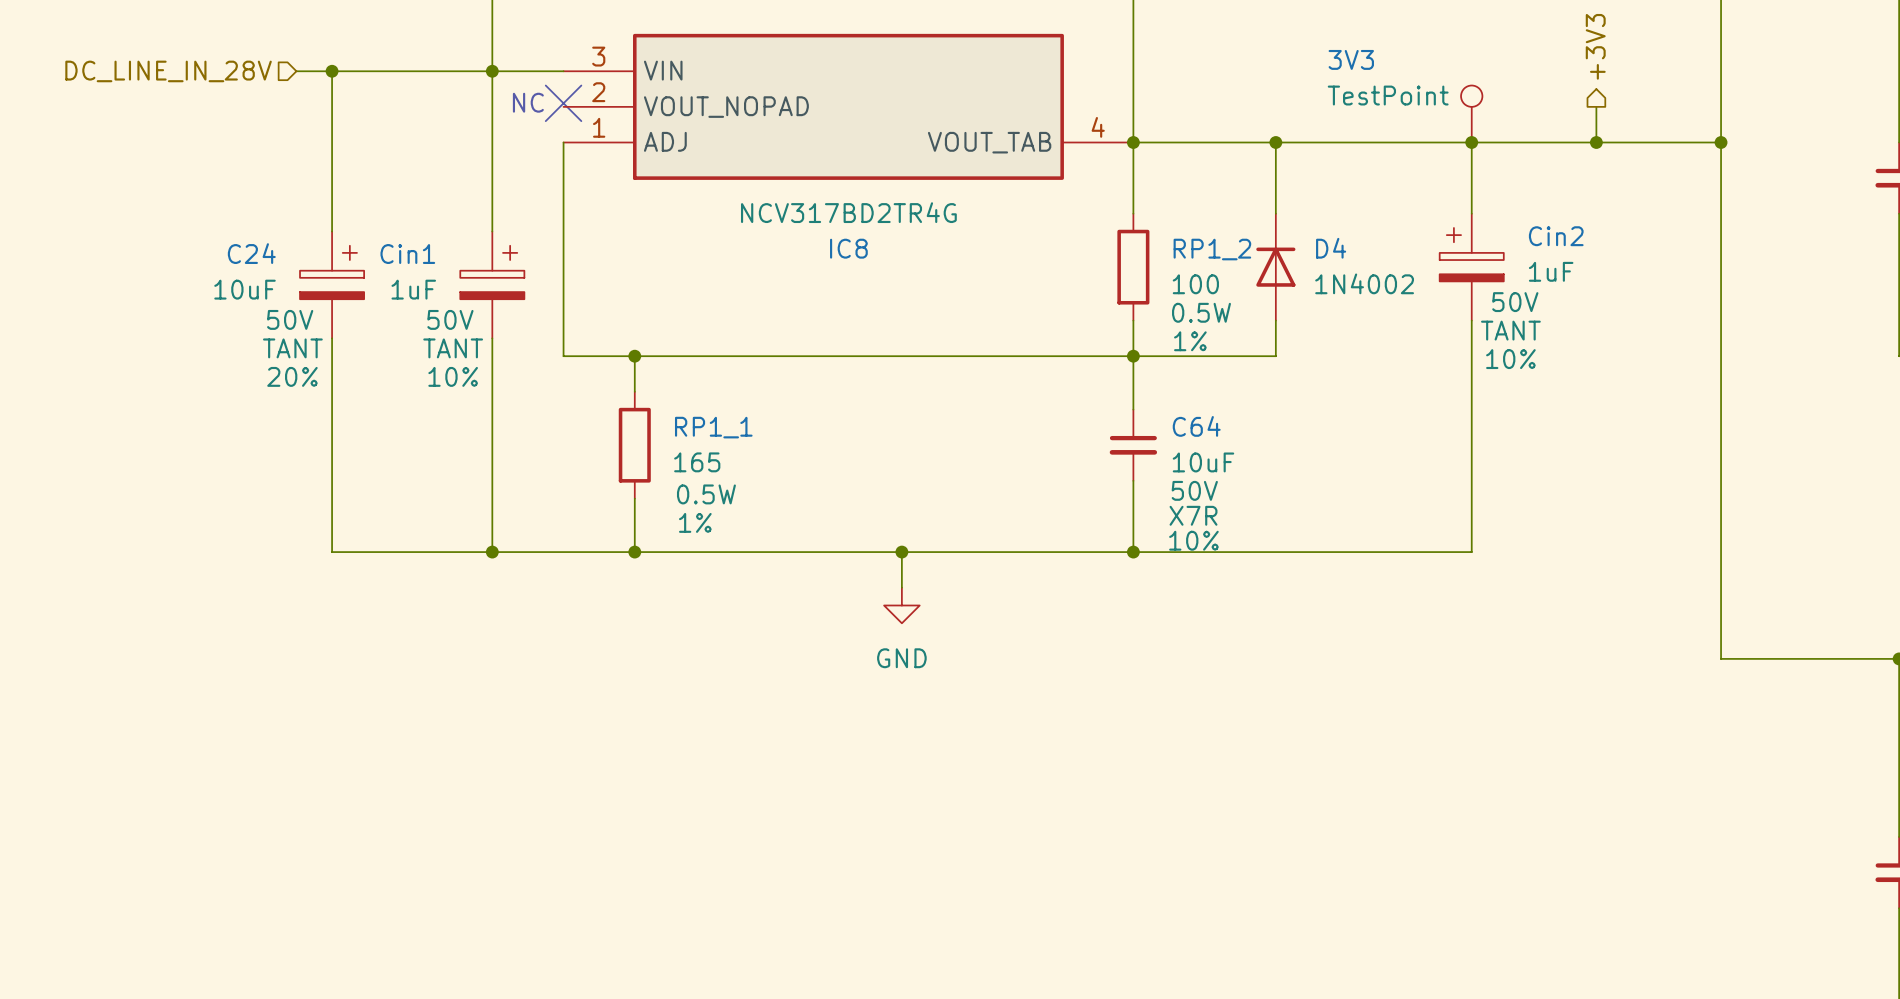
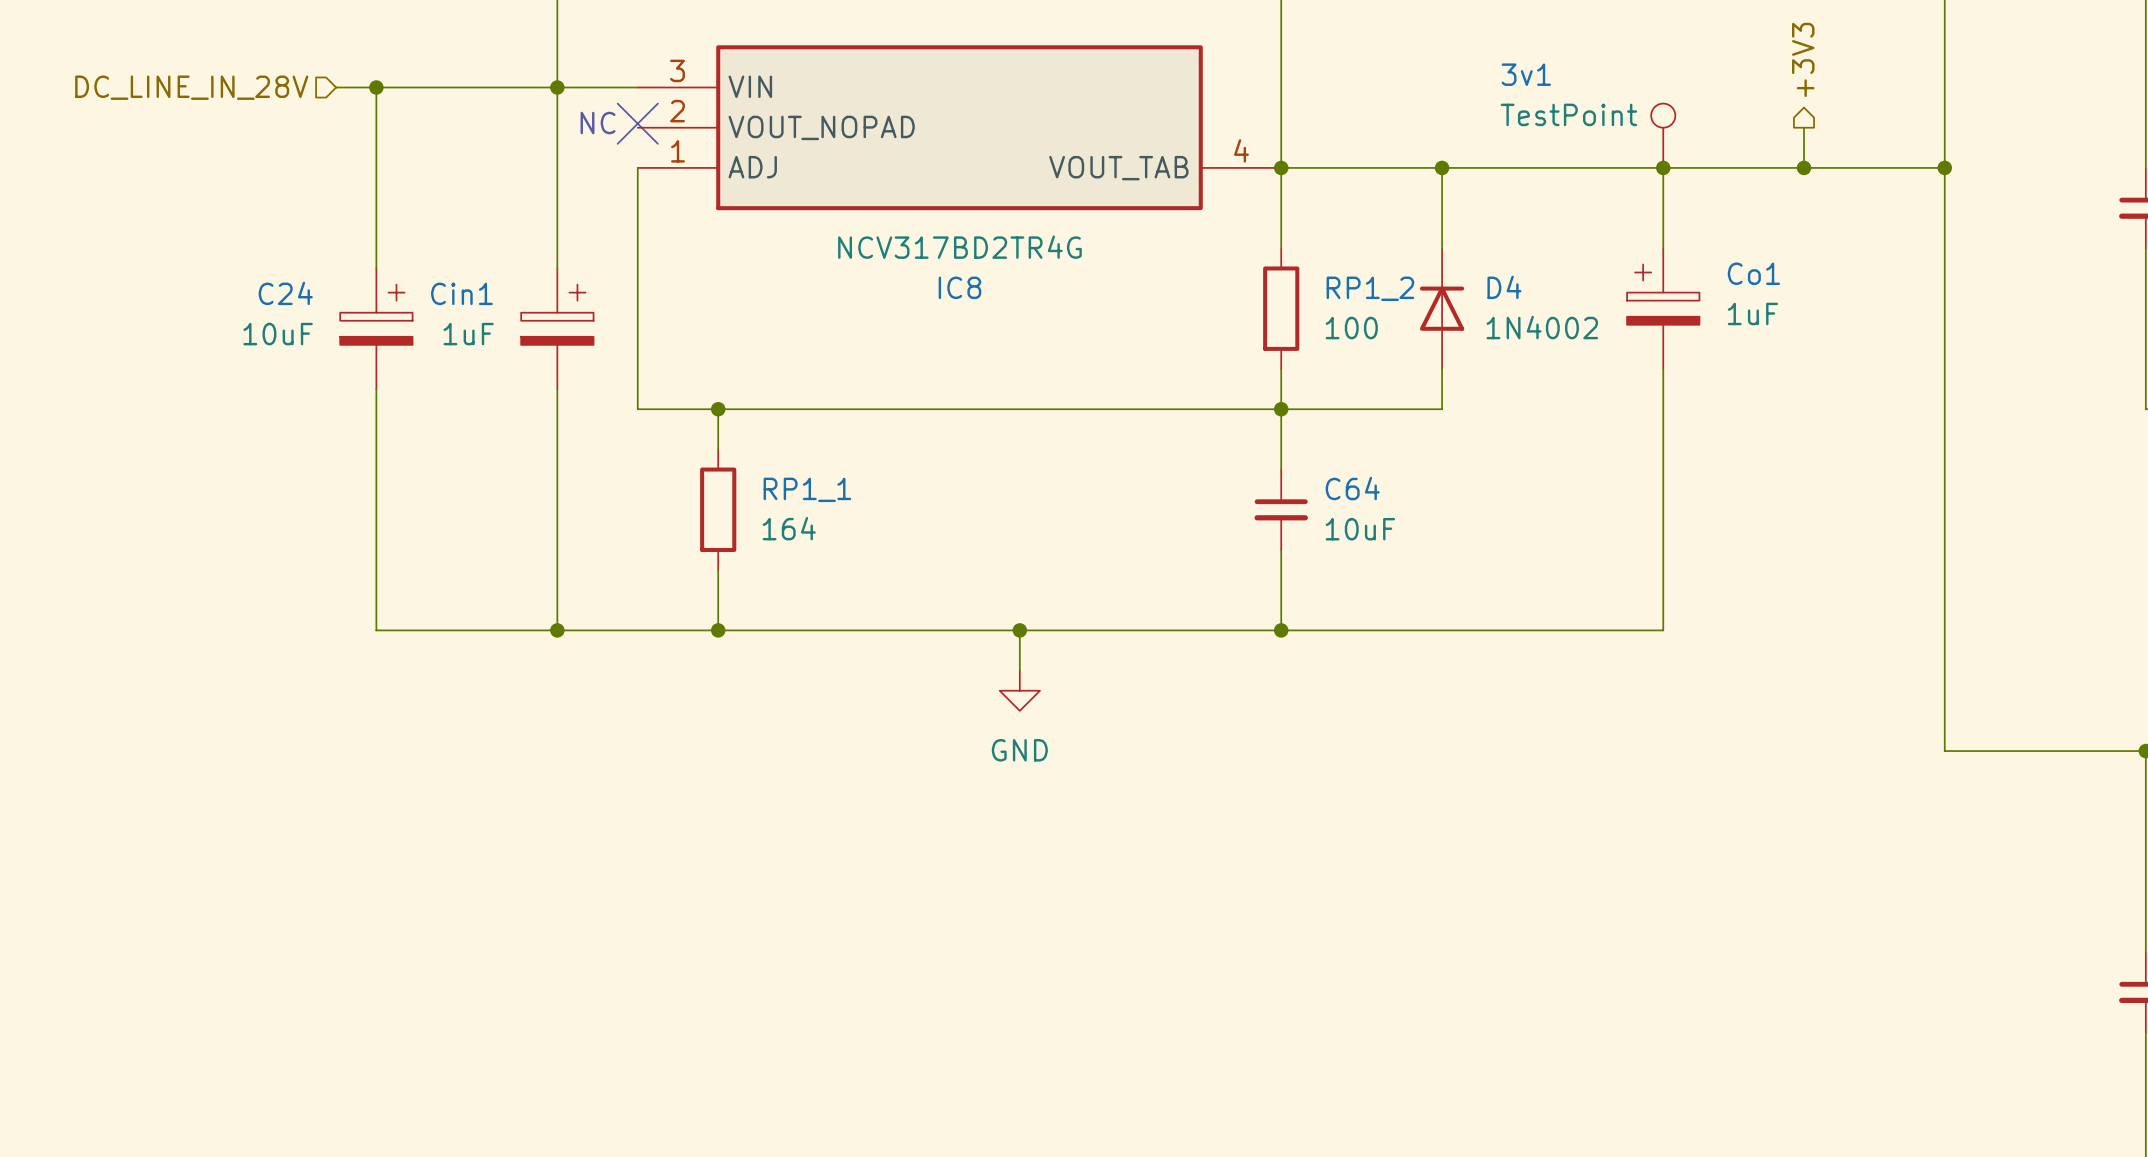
3V3 name: 3V3 (1351, 59) -> 3v1 (1526, 74)
Cin2 name: Cin2 (1556, 236) -> Co1 (1753, 273)
Cin2 text: 50V (1515, 302) -> none
RP1_2 text: 0.5W (1201, 312) -> none
C24 text: 50V (290, 319) -> none
Cin1 text: 50V (450, 319) -> none
Cin2 text: TANT (1510, 330) -> none
RP1_2 text: 1% (1190, 341) -> none
C24 text: TANT (292, 348) -> none
Cin1 text: TANT (453, 348) -> none
Cin2 text: 10% (1510, 359) -> none
C24 text: 20% (292, 376) -> none
Cin1 text: 10% (453, 376) -> none
RP1_1 value: 165 (697, 462) -> 164 (789, 528)
C64 text: 50V (1194, 490) -> none
RP1_1 text: 0.5W (706, 494) -> none
C64 text: X7R (1193, 515) -> none
RP1_1 text: 1% (695, 522) -> none
C64 text: 10% (1193, 540) -> none

